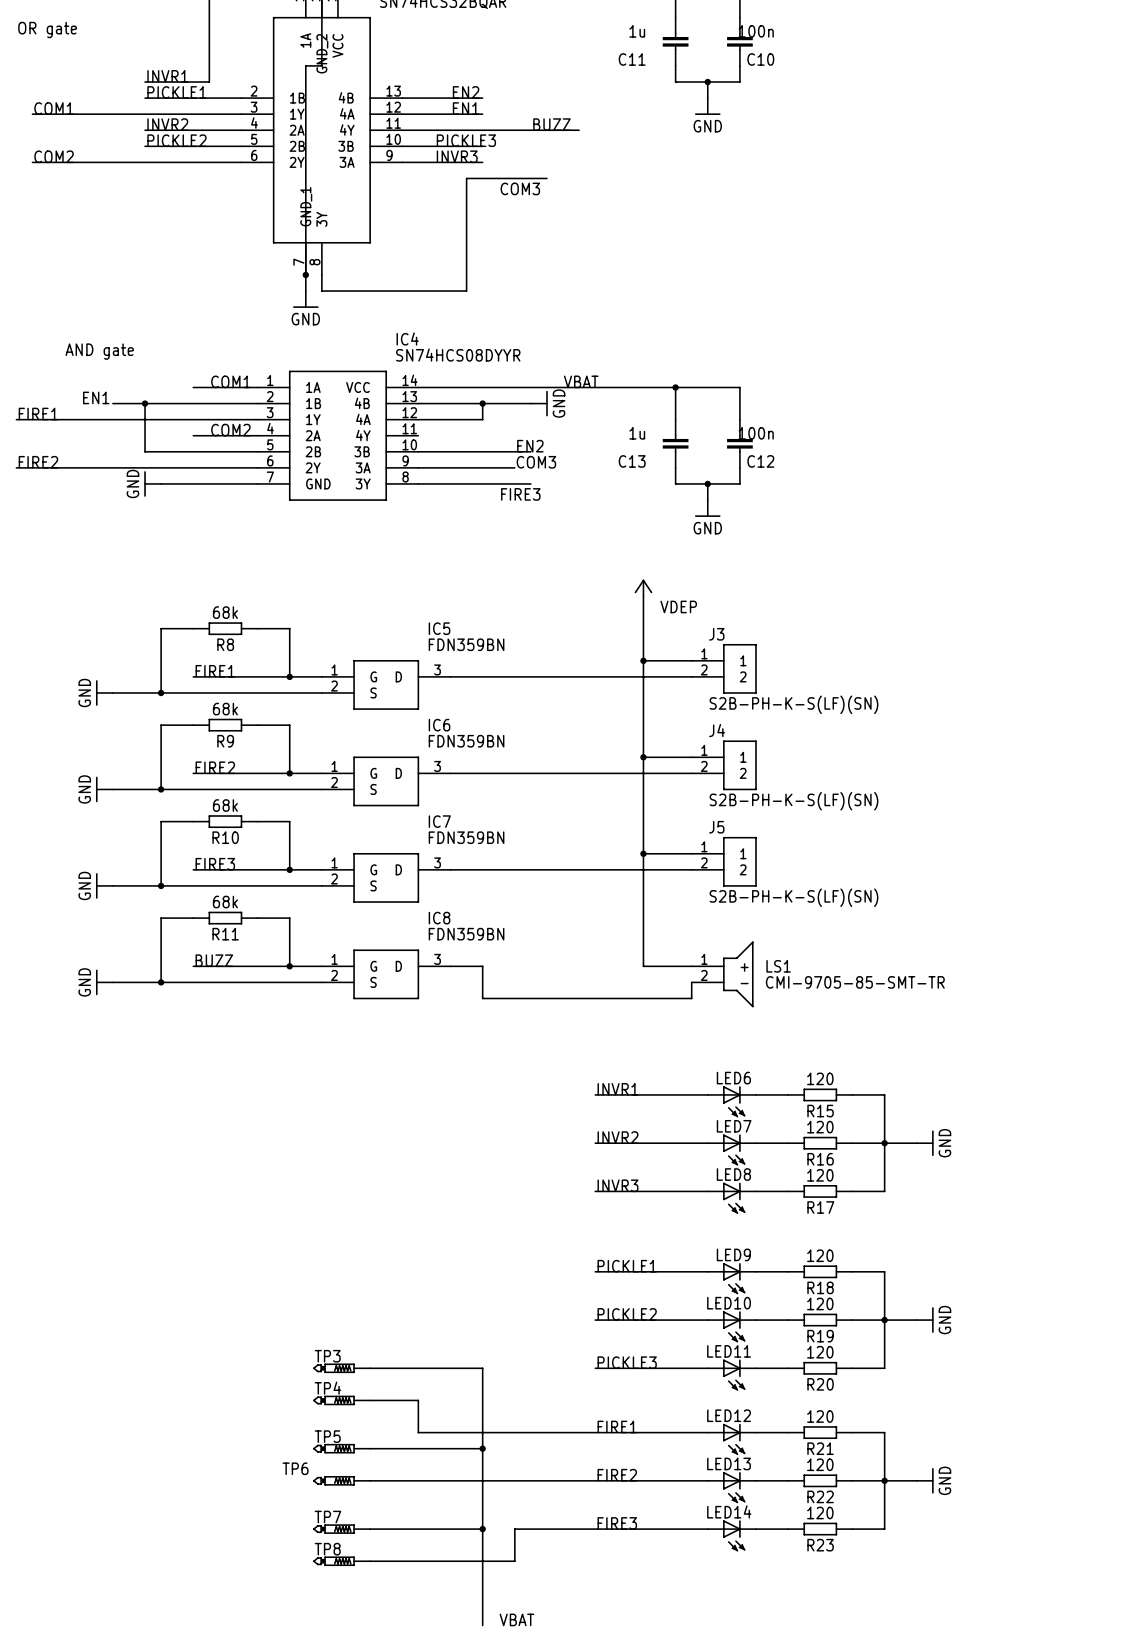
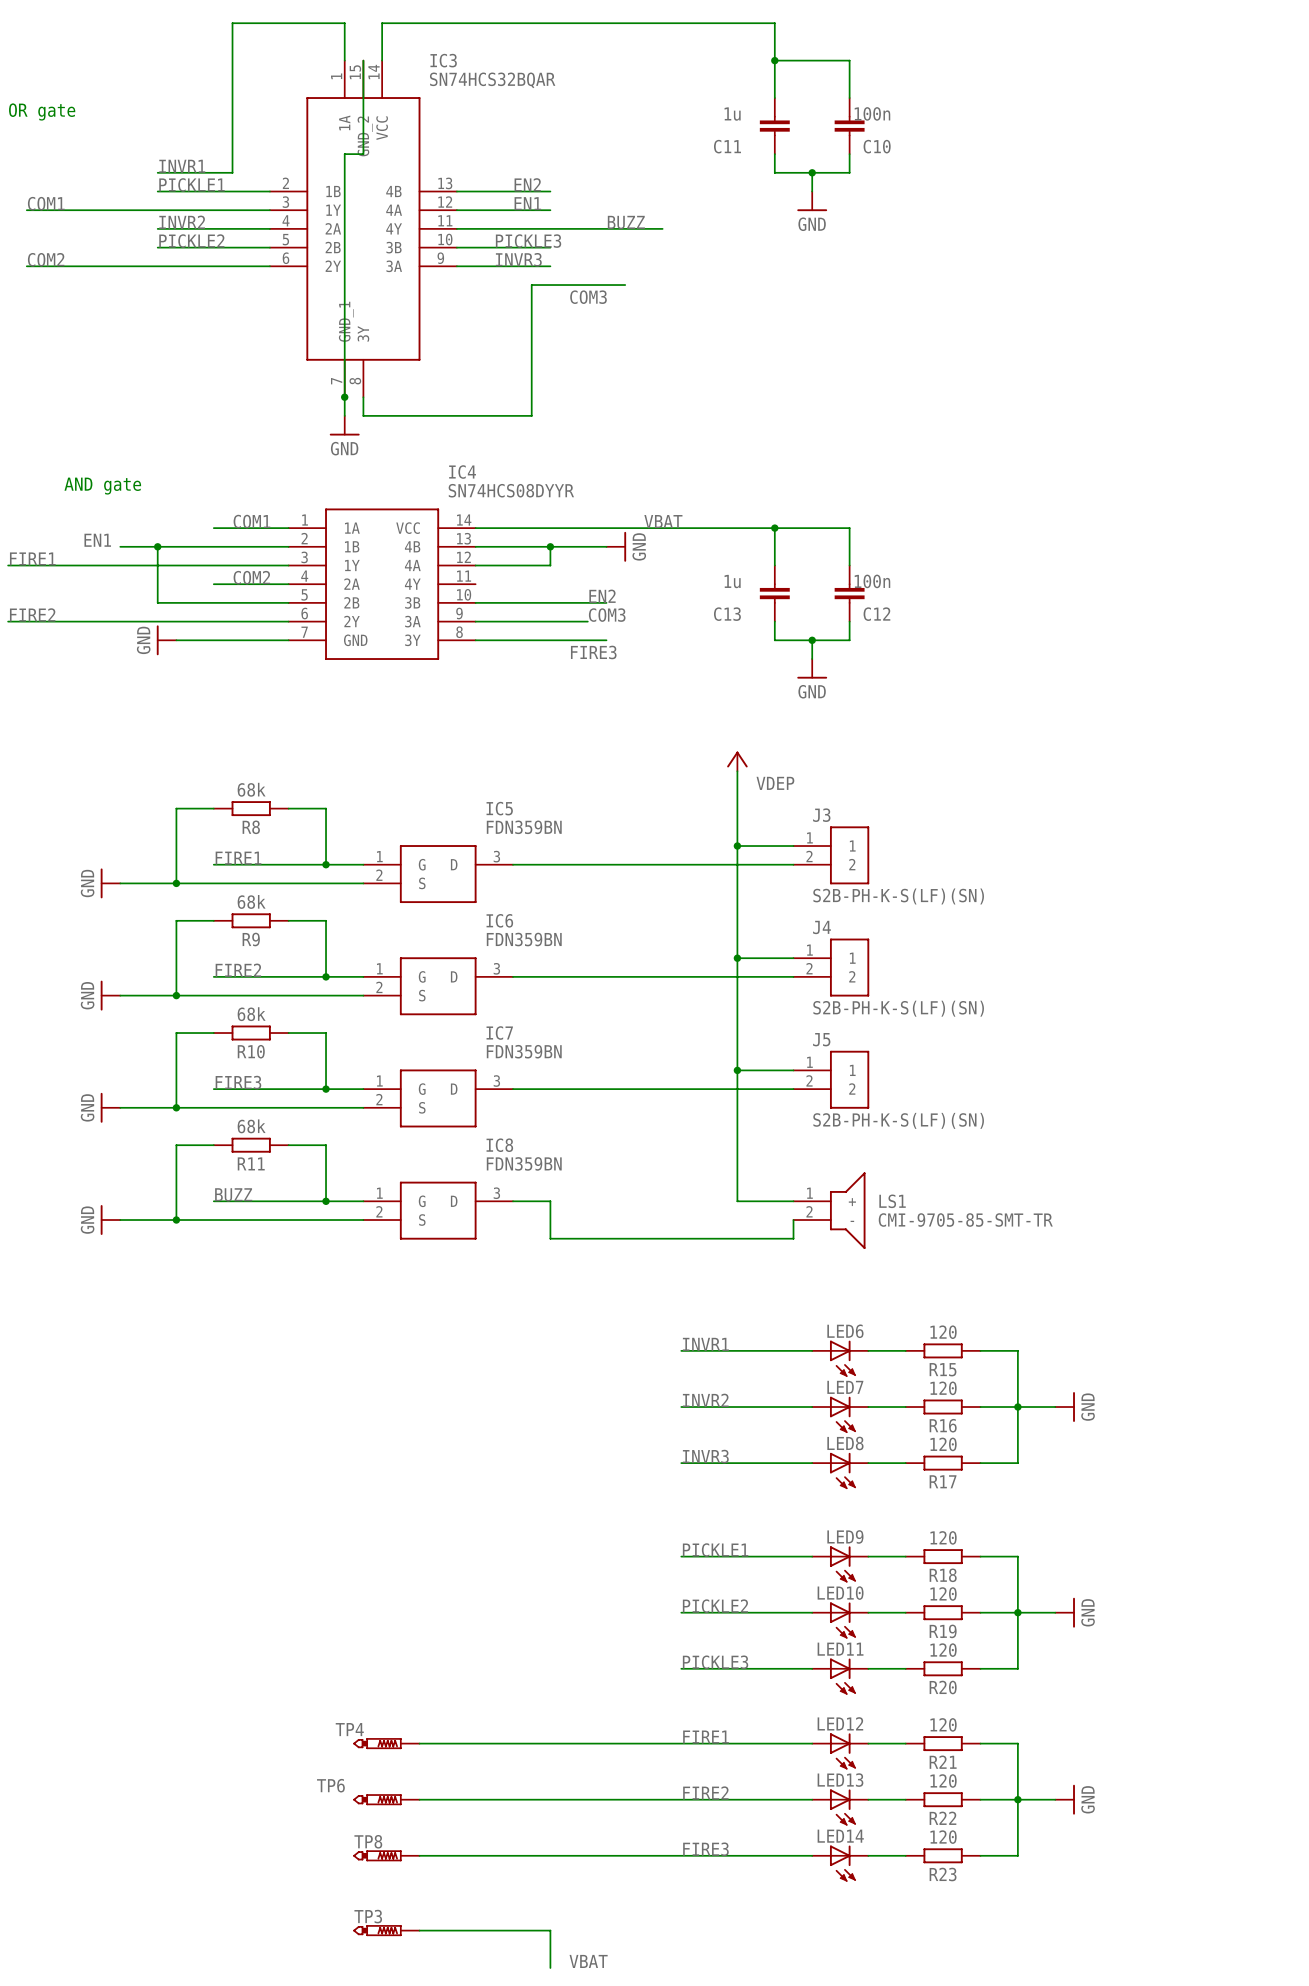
TP3 position: (341, 1368) -> (386, 1930)
wire: (370, 1368) (482, 1368) (482, 1593) -> (419, 1930) (550, 1930)
TP4 name position: TP4 (327, 1388) -> TP4 (349, 1729)
TP4 position: (341, 1400) -> (386, 1743)
wire: (370, 1400) (418, 1400) (418, 1432) -> (419, 1743) (475, 1743)
TP5: (341, 1448) -> none
wire: (370, 1448) (482, 1448) -> none
junction: (482, 1448) -> none
TP7 name: TP7 (327, 1517) -> TP8 (368, 1841)
junction: (482, 1529) -> none
wire: (514, 1529) (514, 1561) (370, 1561) -> (587, 1855) (550, 1855)
TP8: (341, 1561) -> none

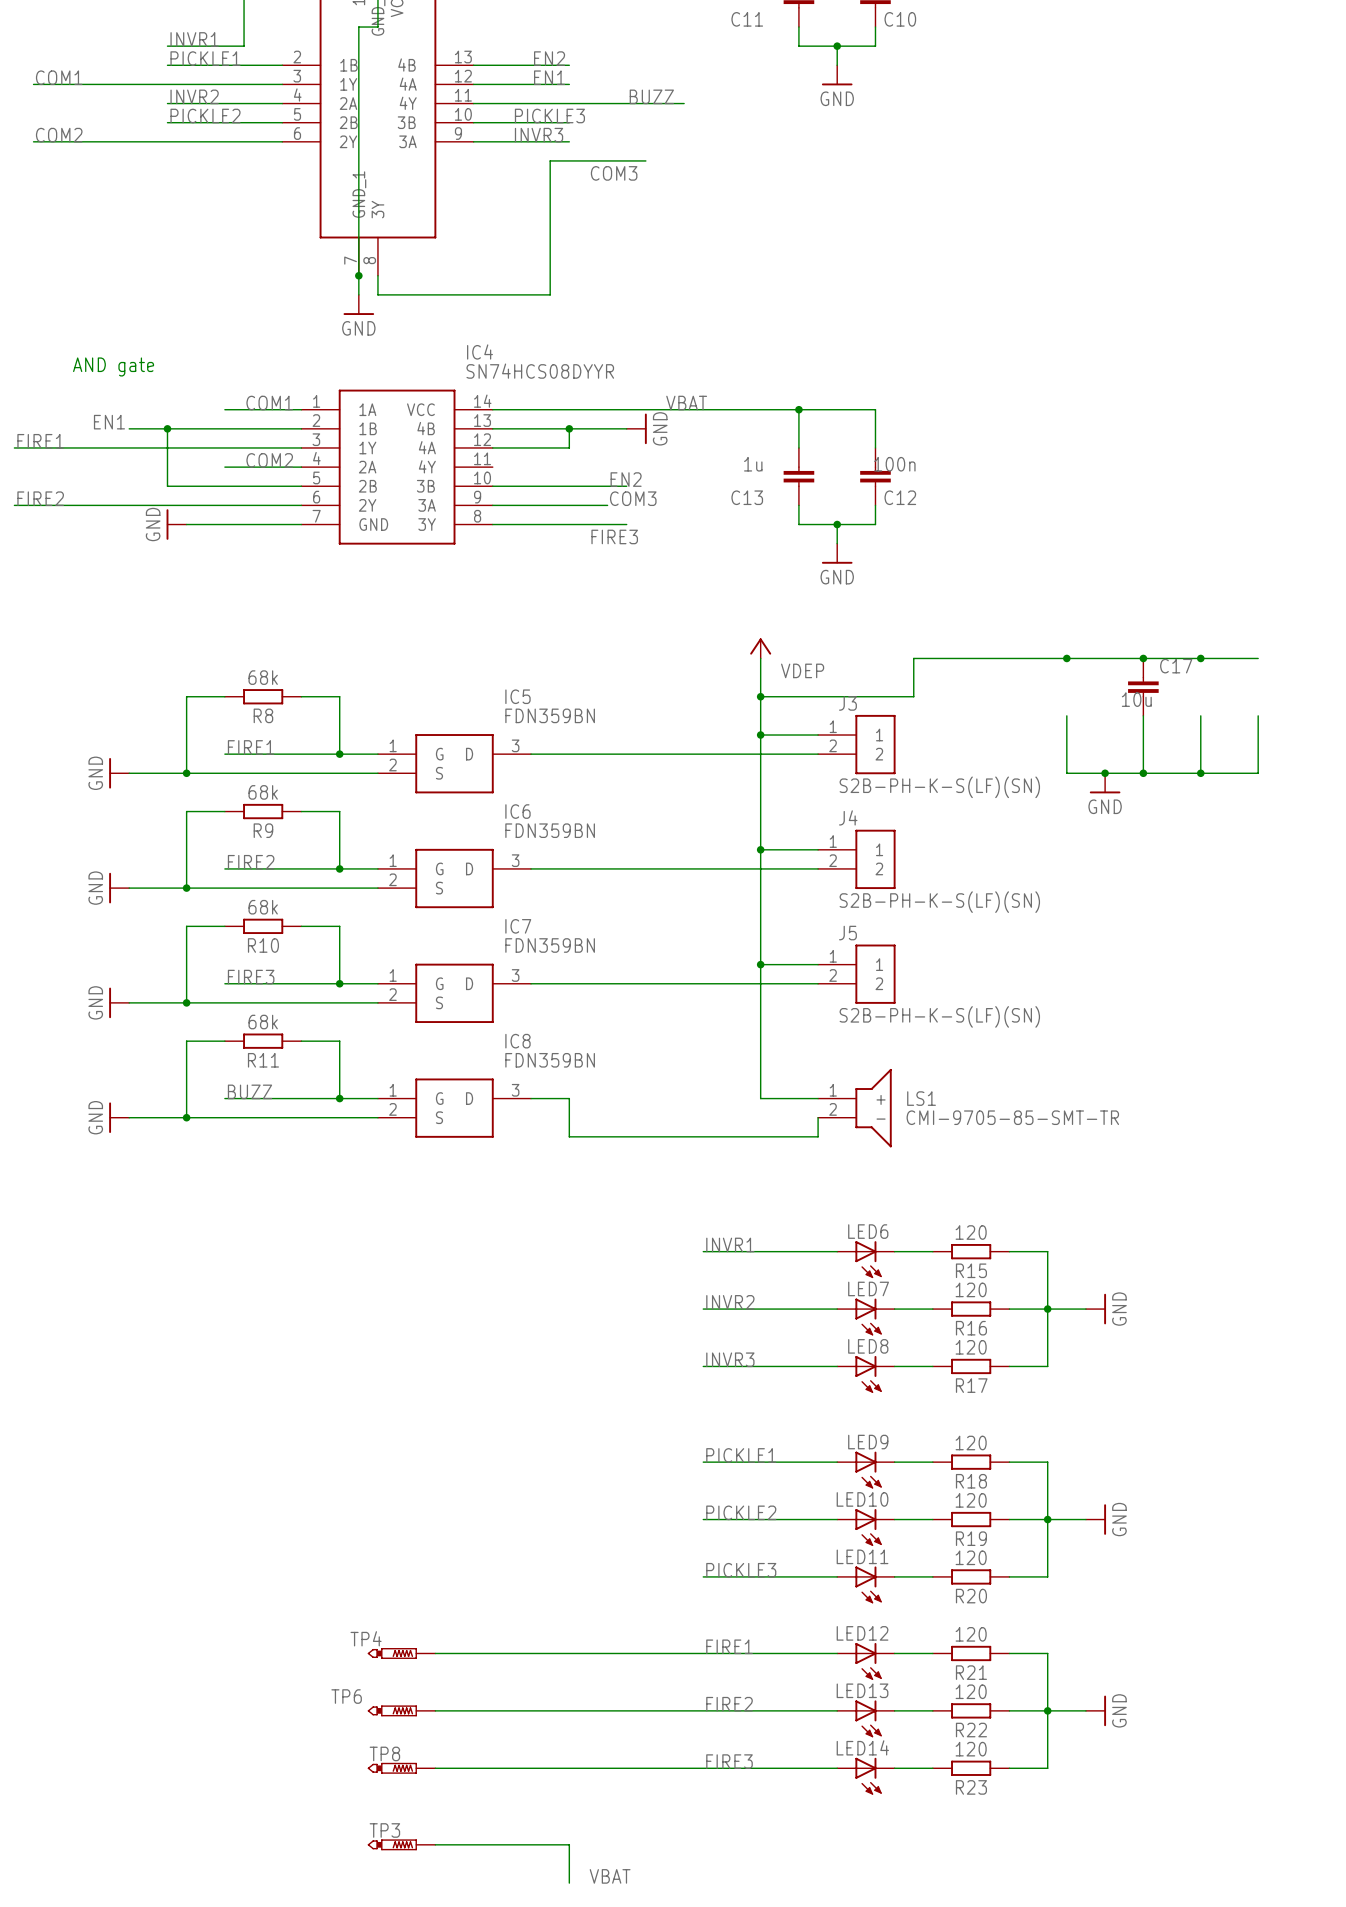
junction: none -> (1066, 658)
junction: none -> (1143, 658)
junction: none -> (1200, 658)
wire: none -> (1258, 658) (913, 658) (913, 696) (760, 696)
C17: none -> 10u (1143, 687)
junction: none -> (760, 696)
wire: none -> (1066, 715) (1066, 773) (1258, 773) (1258, 715)
wire: none -> (1143, 715) (1143, 773)
wire: none -> (1200, 715) (1200, 773)
junction: none -> (1105, 773)
junction: none -> (1143, 773)
junction: none -> (1200, 773)
power symbol: none -> GND (1105, 783)

